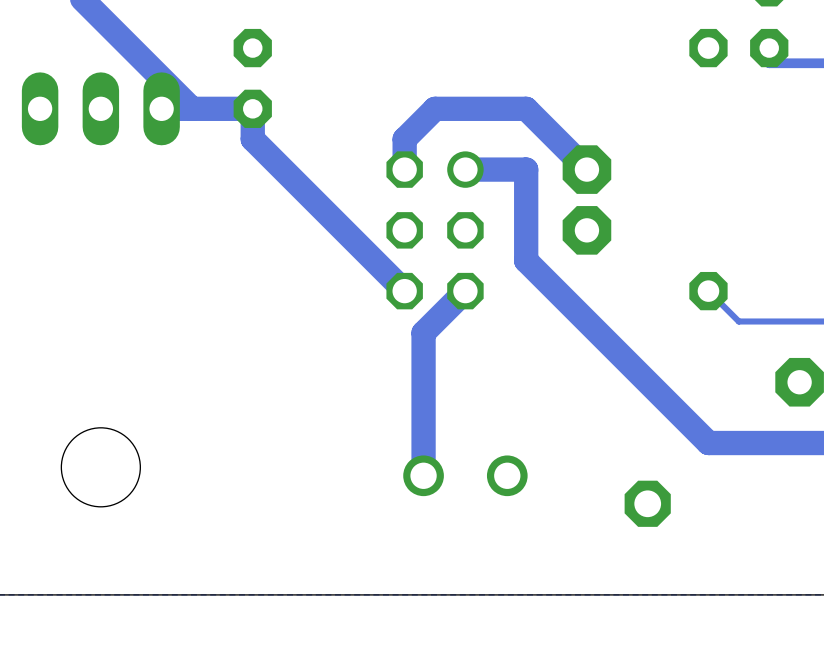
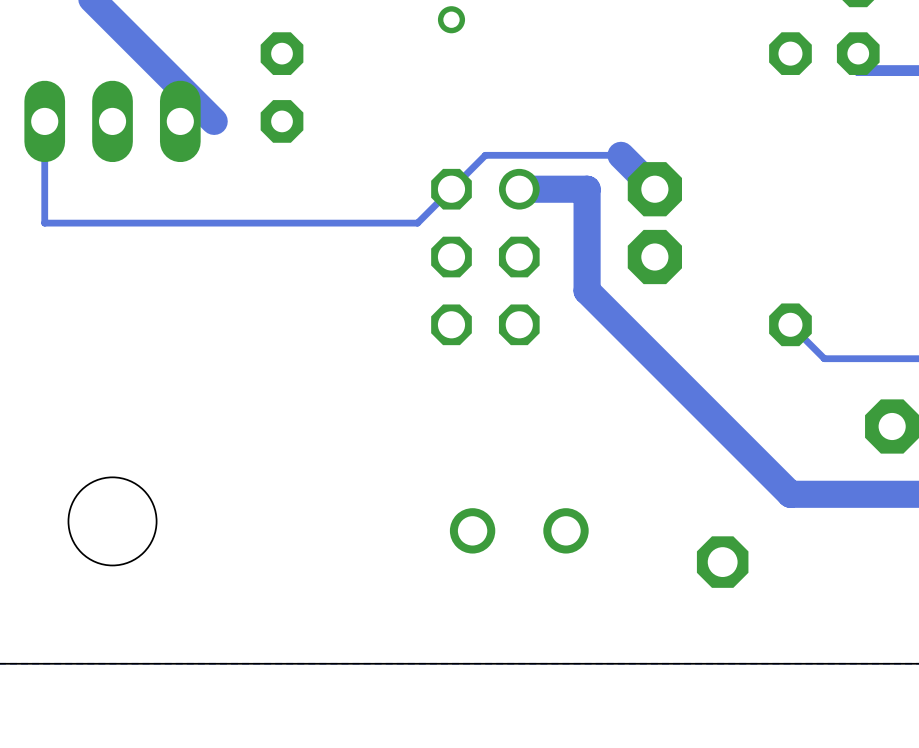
via: none -> (451, 19)
track: (161, 108) (252, 108) (252, 139) (404, 291) -> none
track: (556, 139) (526, 108) (435, 108) (404, 139) (404, 169) -> (620, 155) (485, 155) (417, 223) (44, 223) (44, 121)
track: (465, 291) (423, 332) (423, 475) -> none

